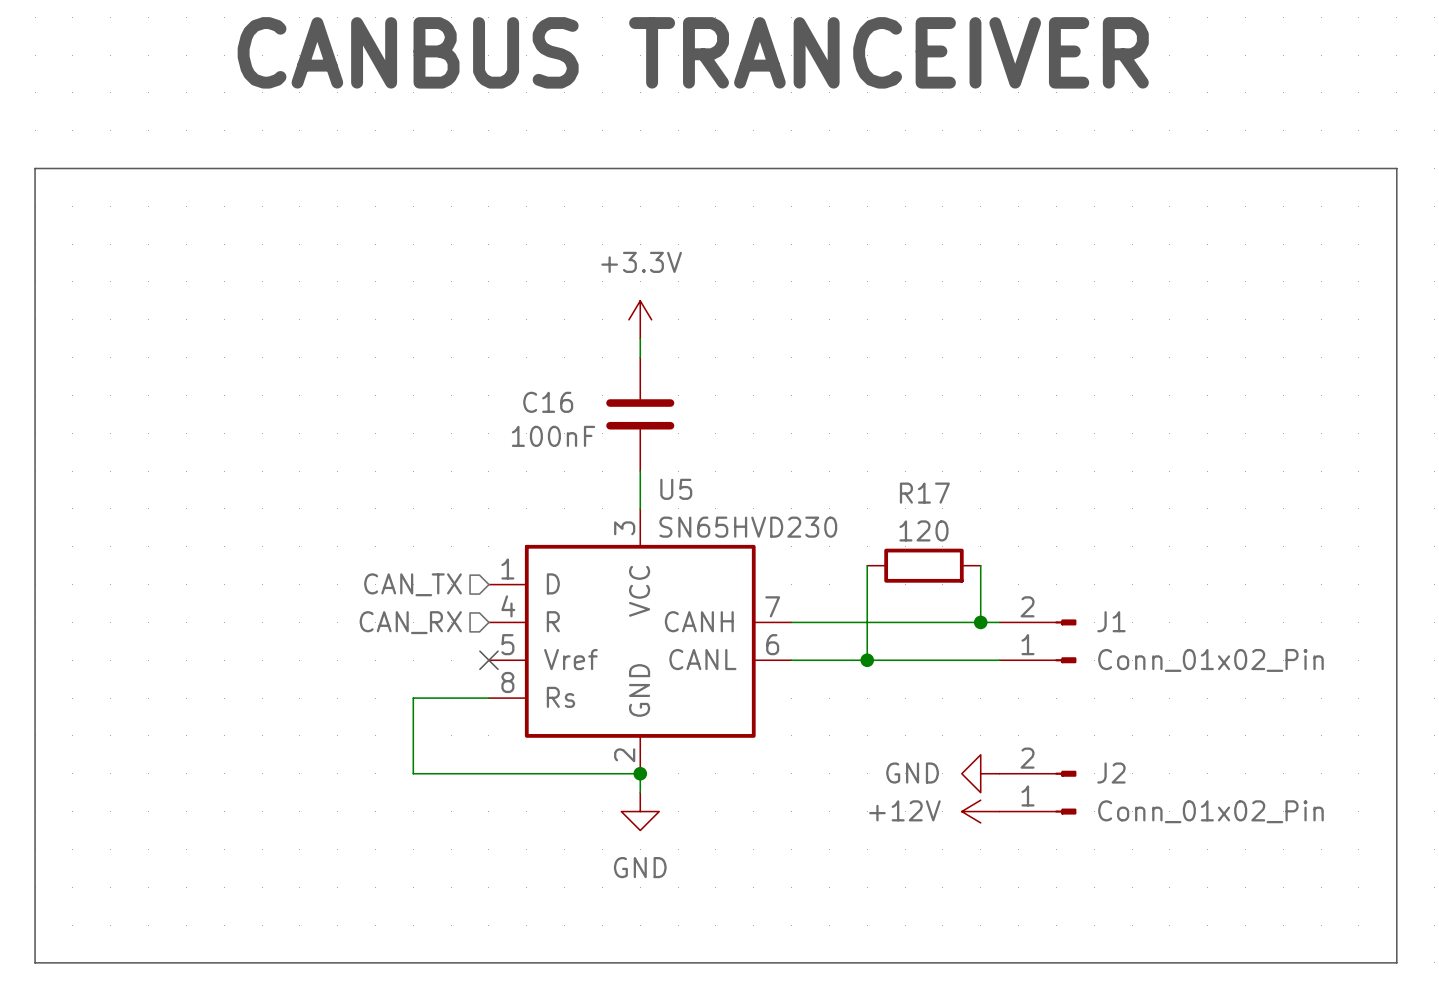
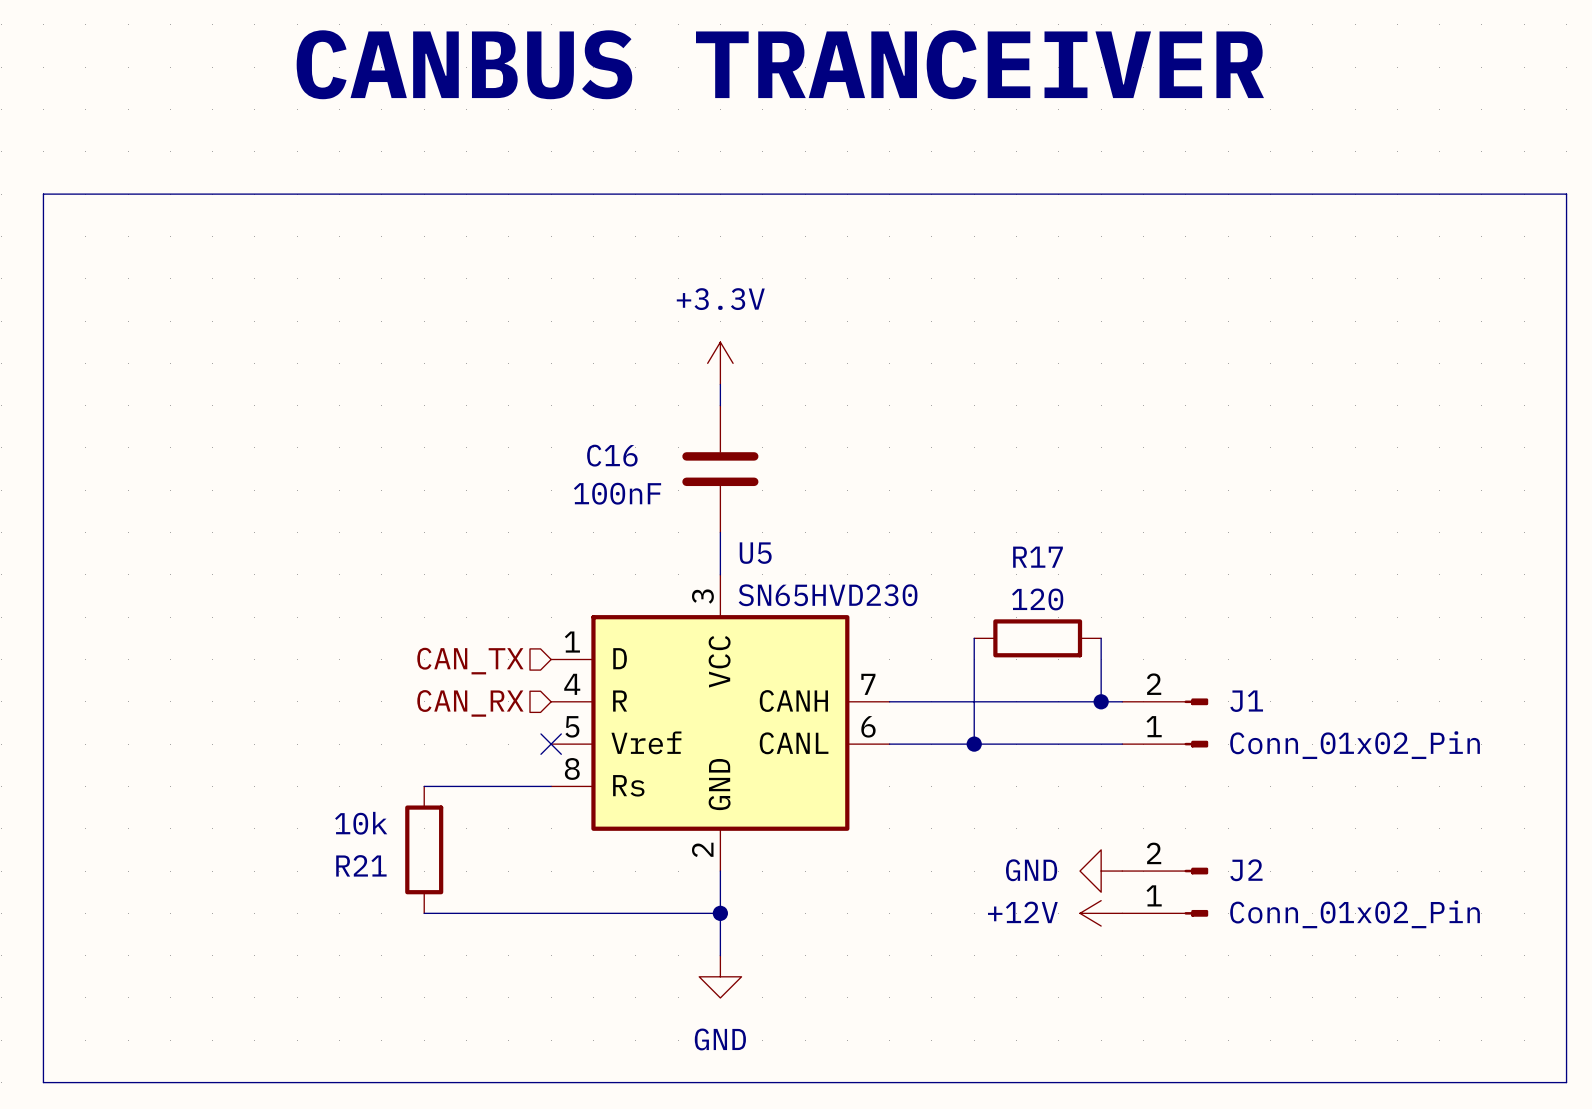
wire: (413, 698) (413, 773) (640, 773) -> (466, 786) (424, 786)
R21: none -> 10k (424, 849)
junction position: (640, 773) -> (720, 913)
wire: none -> (720, 892) (720, 955)
wire: none -> (424, 913) (720, 913)
power symbol position: GND (640, 811) -> GND (720, 976)

